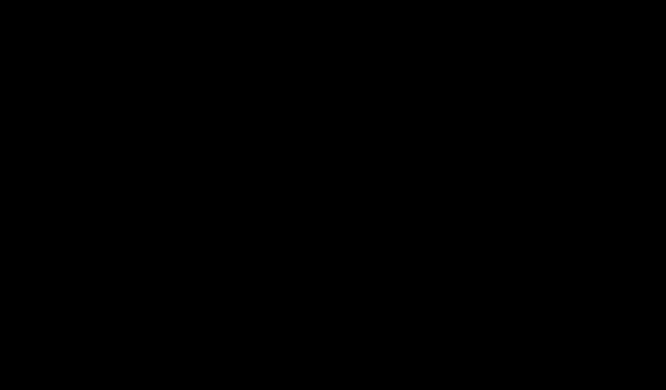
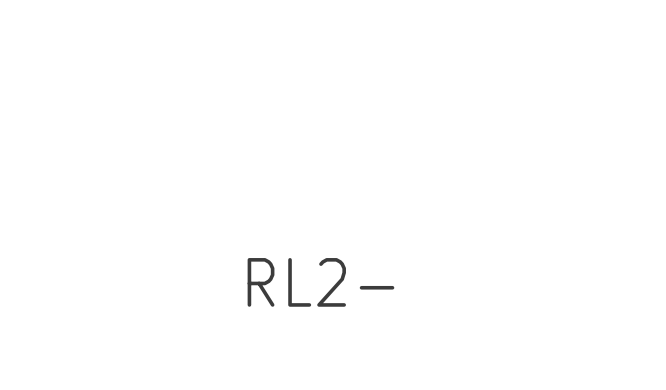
text: none -> RL2- (320, 282)

